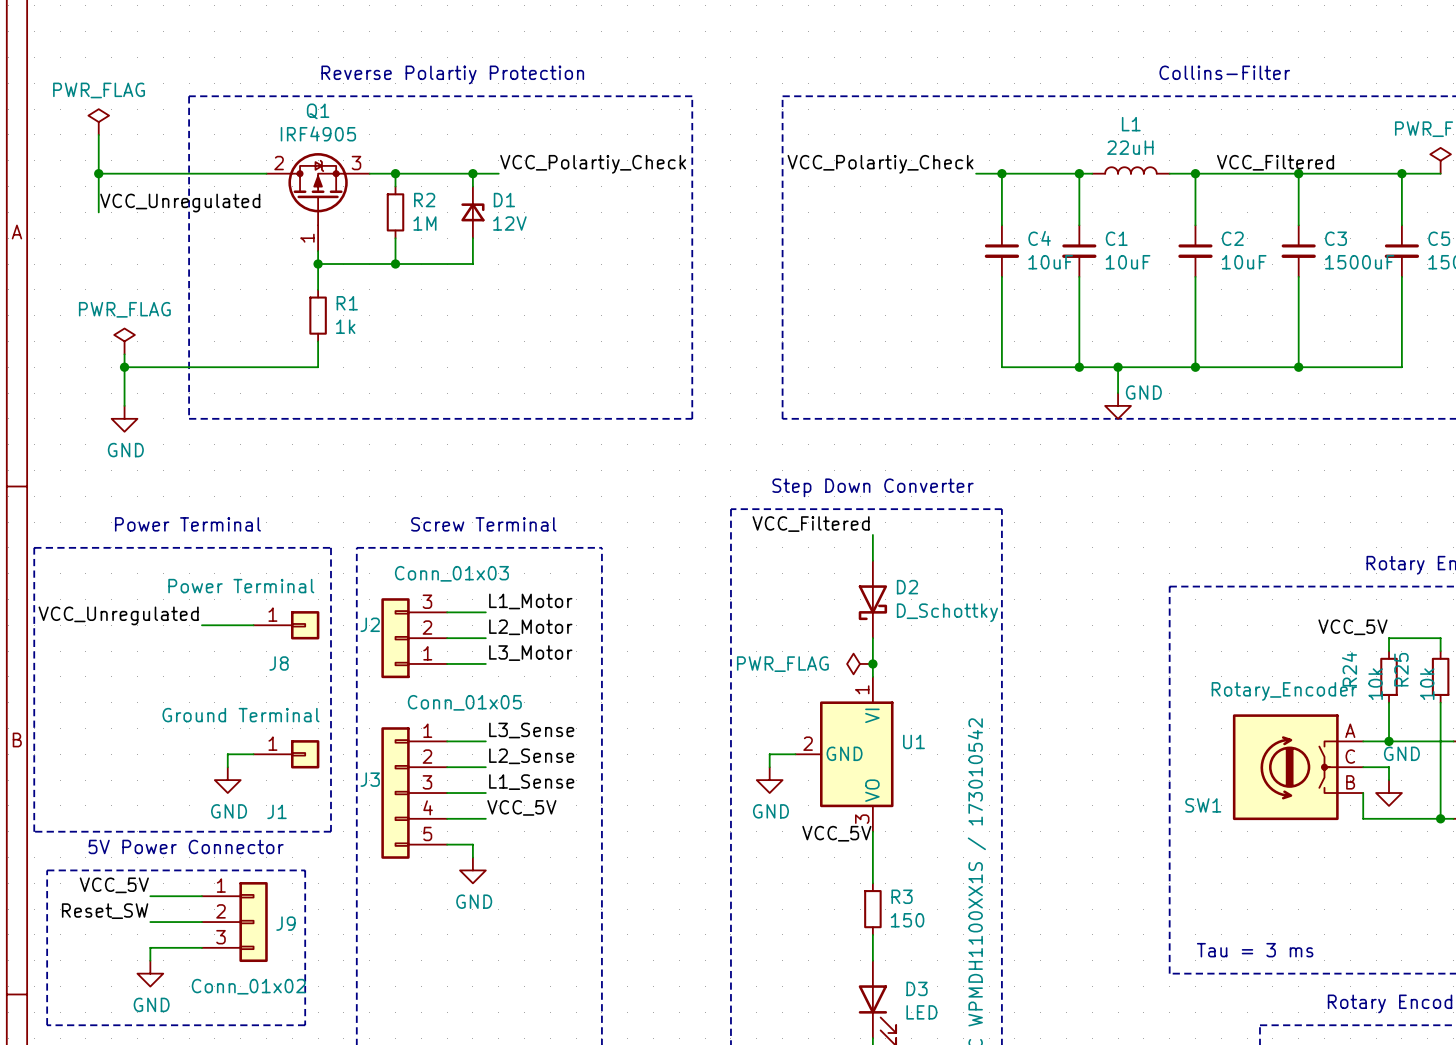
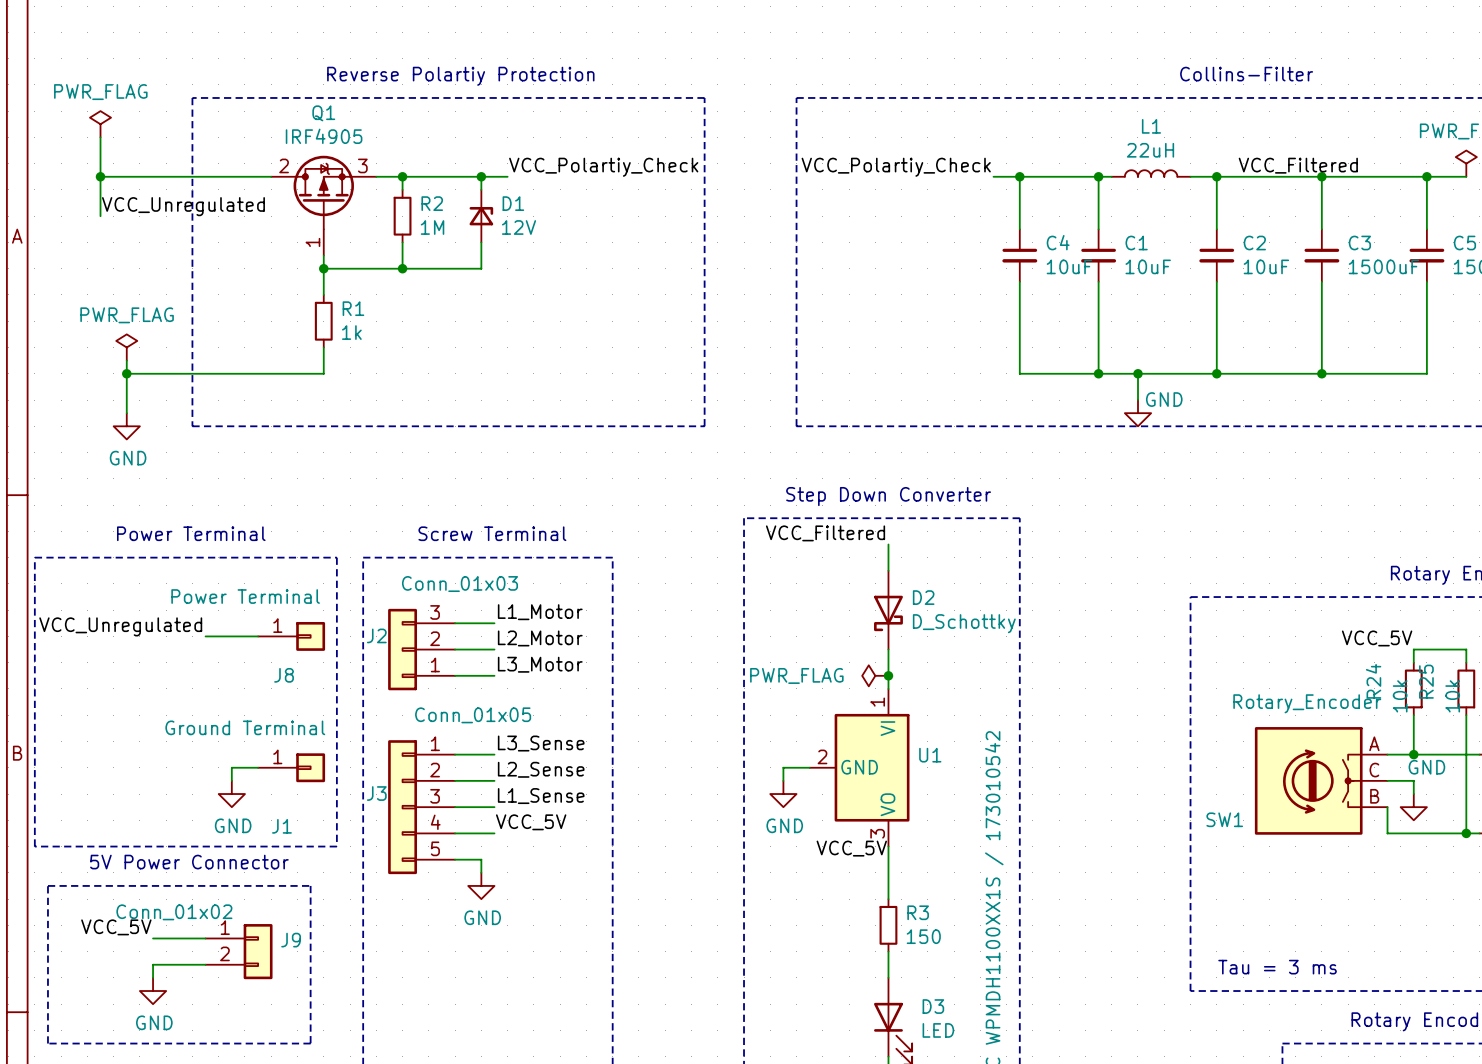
J9 symbol: [201, 882, 268, 963] -> [205, 924, 273, 980]
label: VCC_5V (114, 885) -> none
wire: (150, 896) (201, 896) -> none
label: Reset_SW (105, 911) -> VCC_5V (116, 927)
J9 value position: Conn_01x02 (248, 986) -> Conn_01x02 (174, 912)

